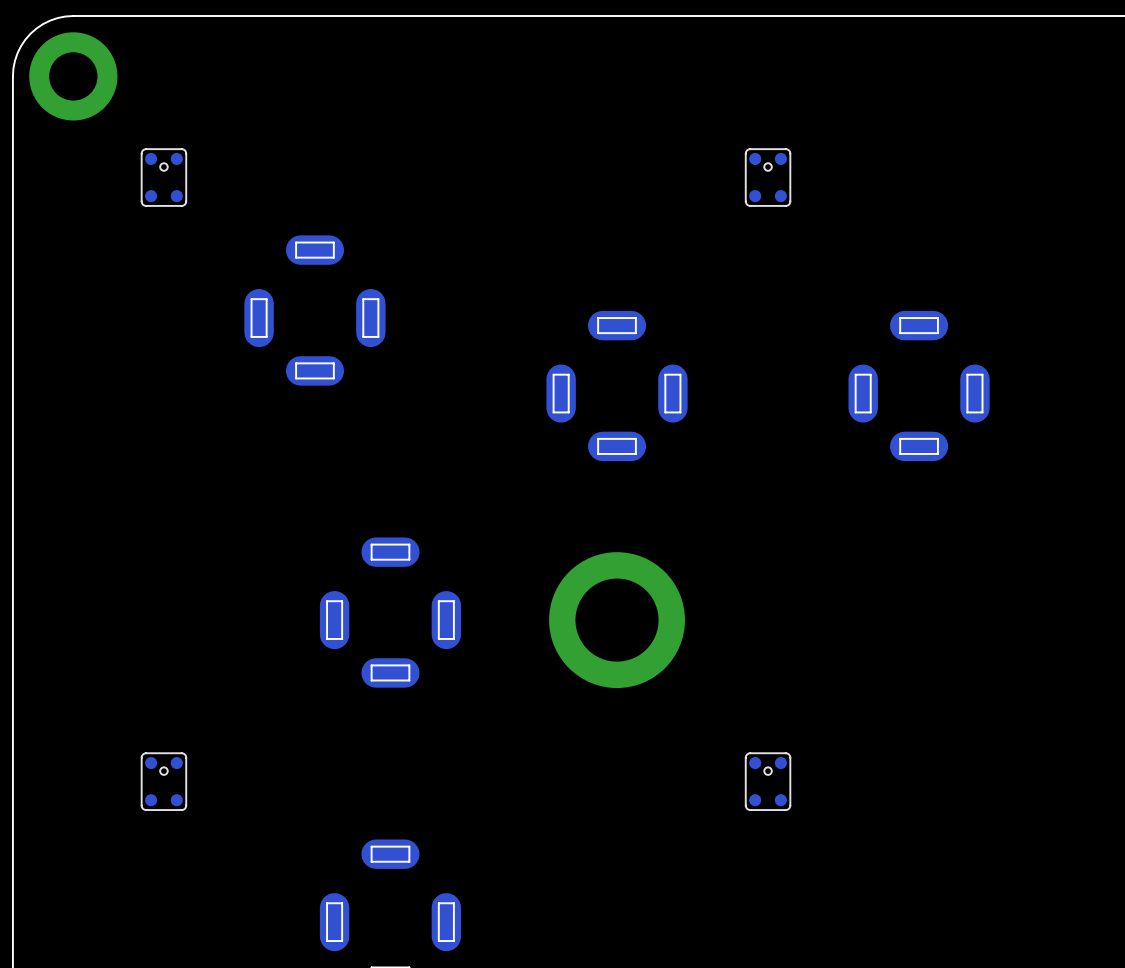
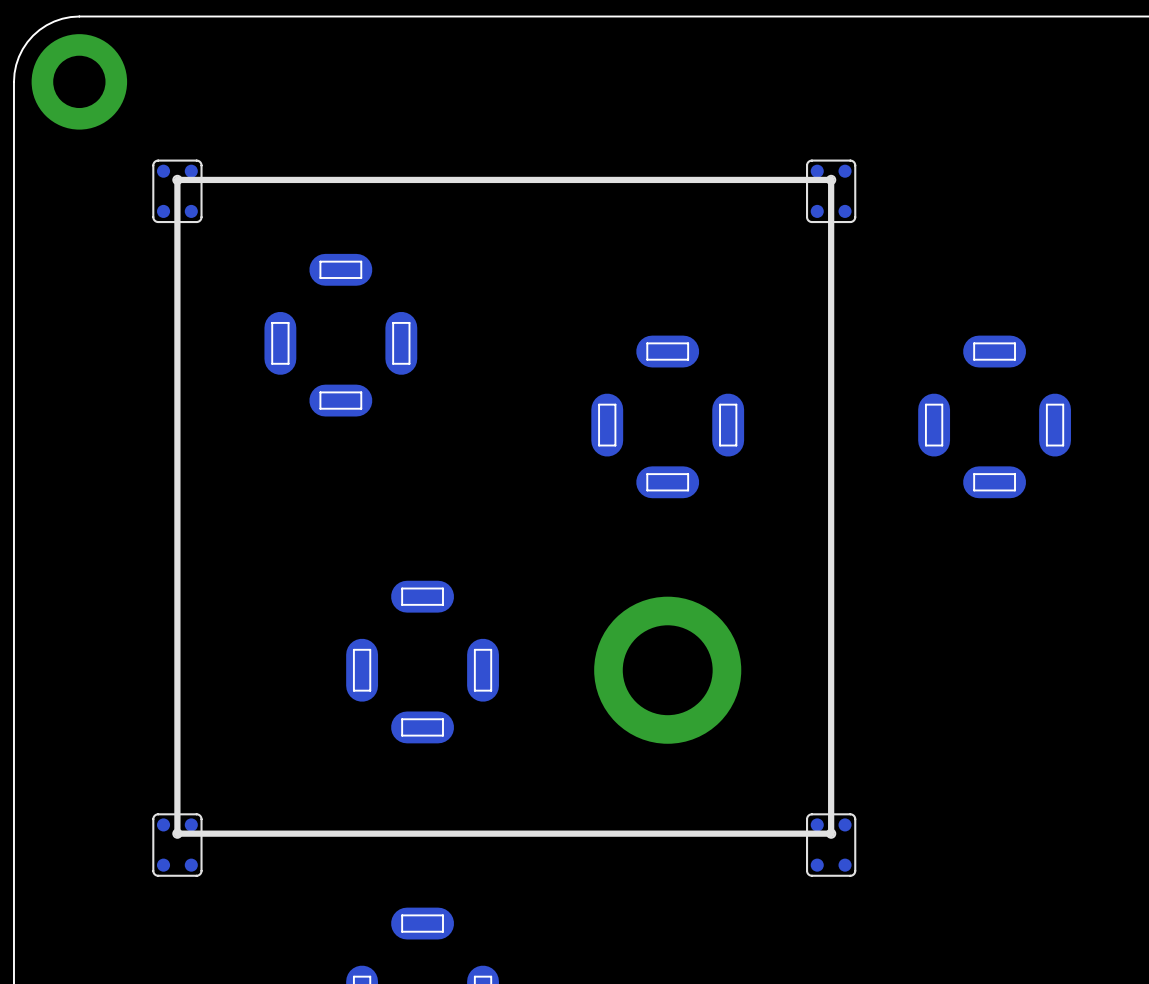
line: none -> (831, 179) (177, 179) (177, 833) (831, 833) (831, 179)

